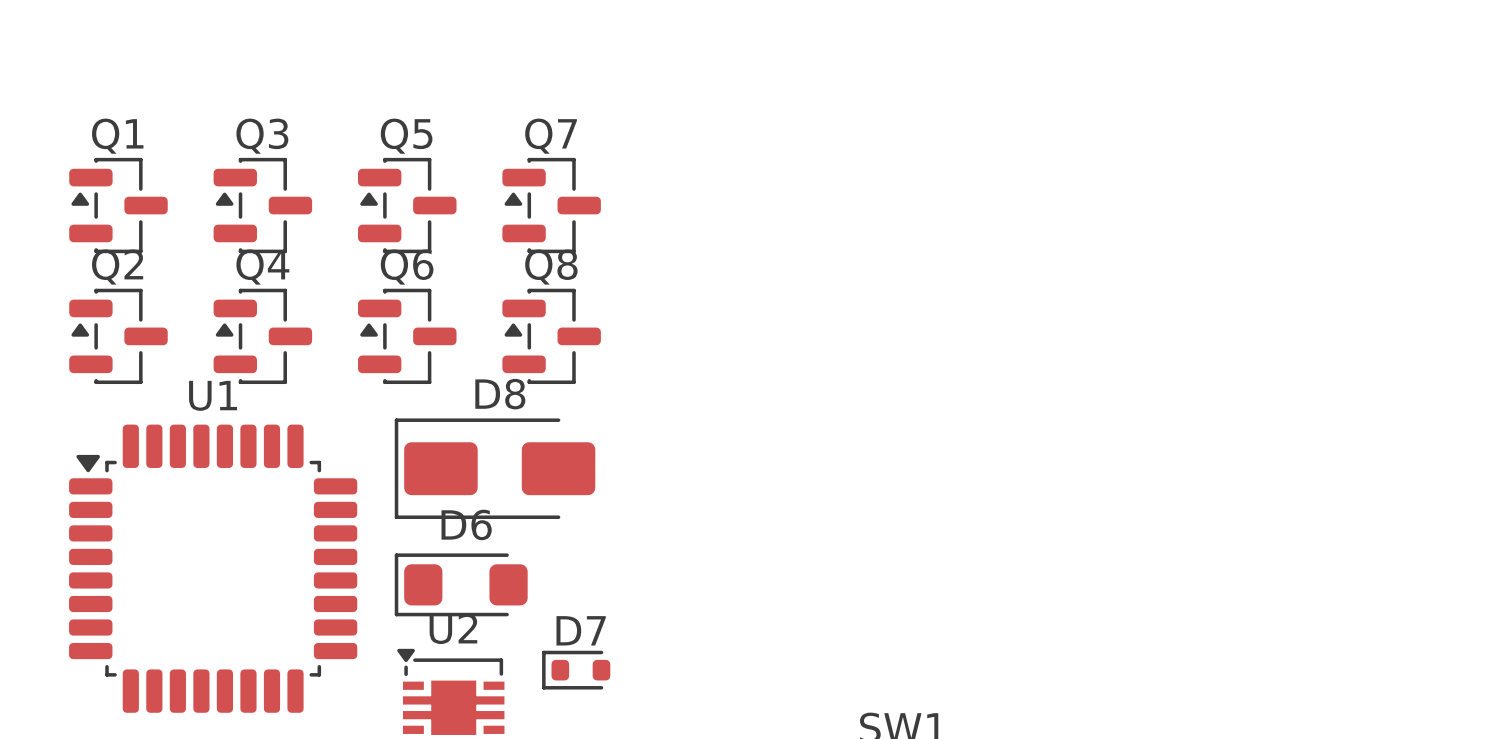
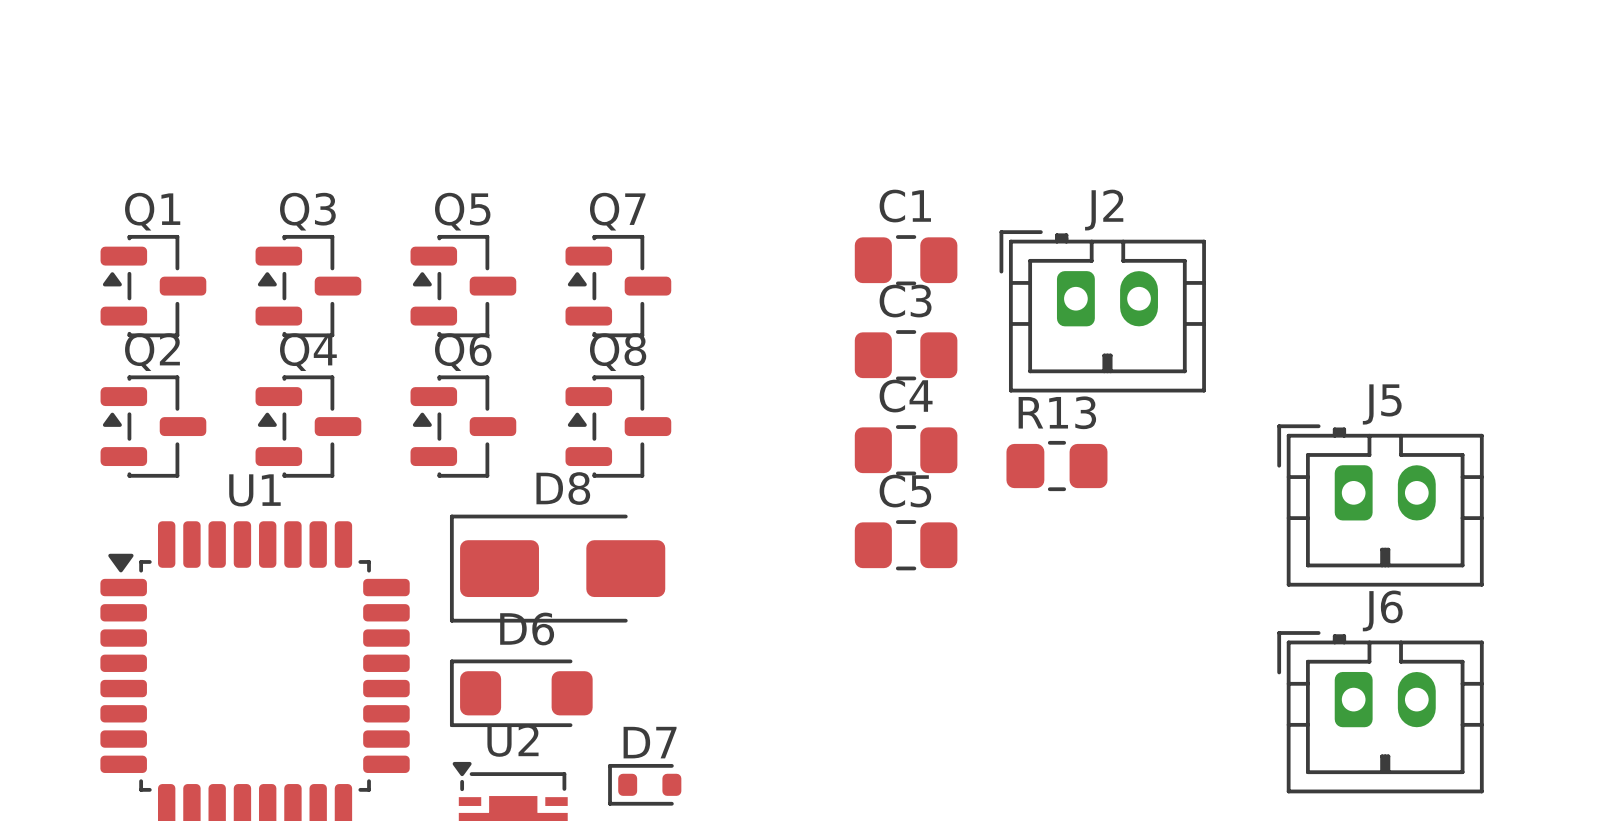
C1: none -> (906, 260)
J2: none -> (1102, 311)
C3: none -> (906, 355)
C4: none -> (906, 450)
R13: none -> (1056, 466)
J5: none -> (1380, 505)
C5: none -> (906, 545)
J6: none -> (1380, 712)

